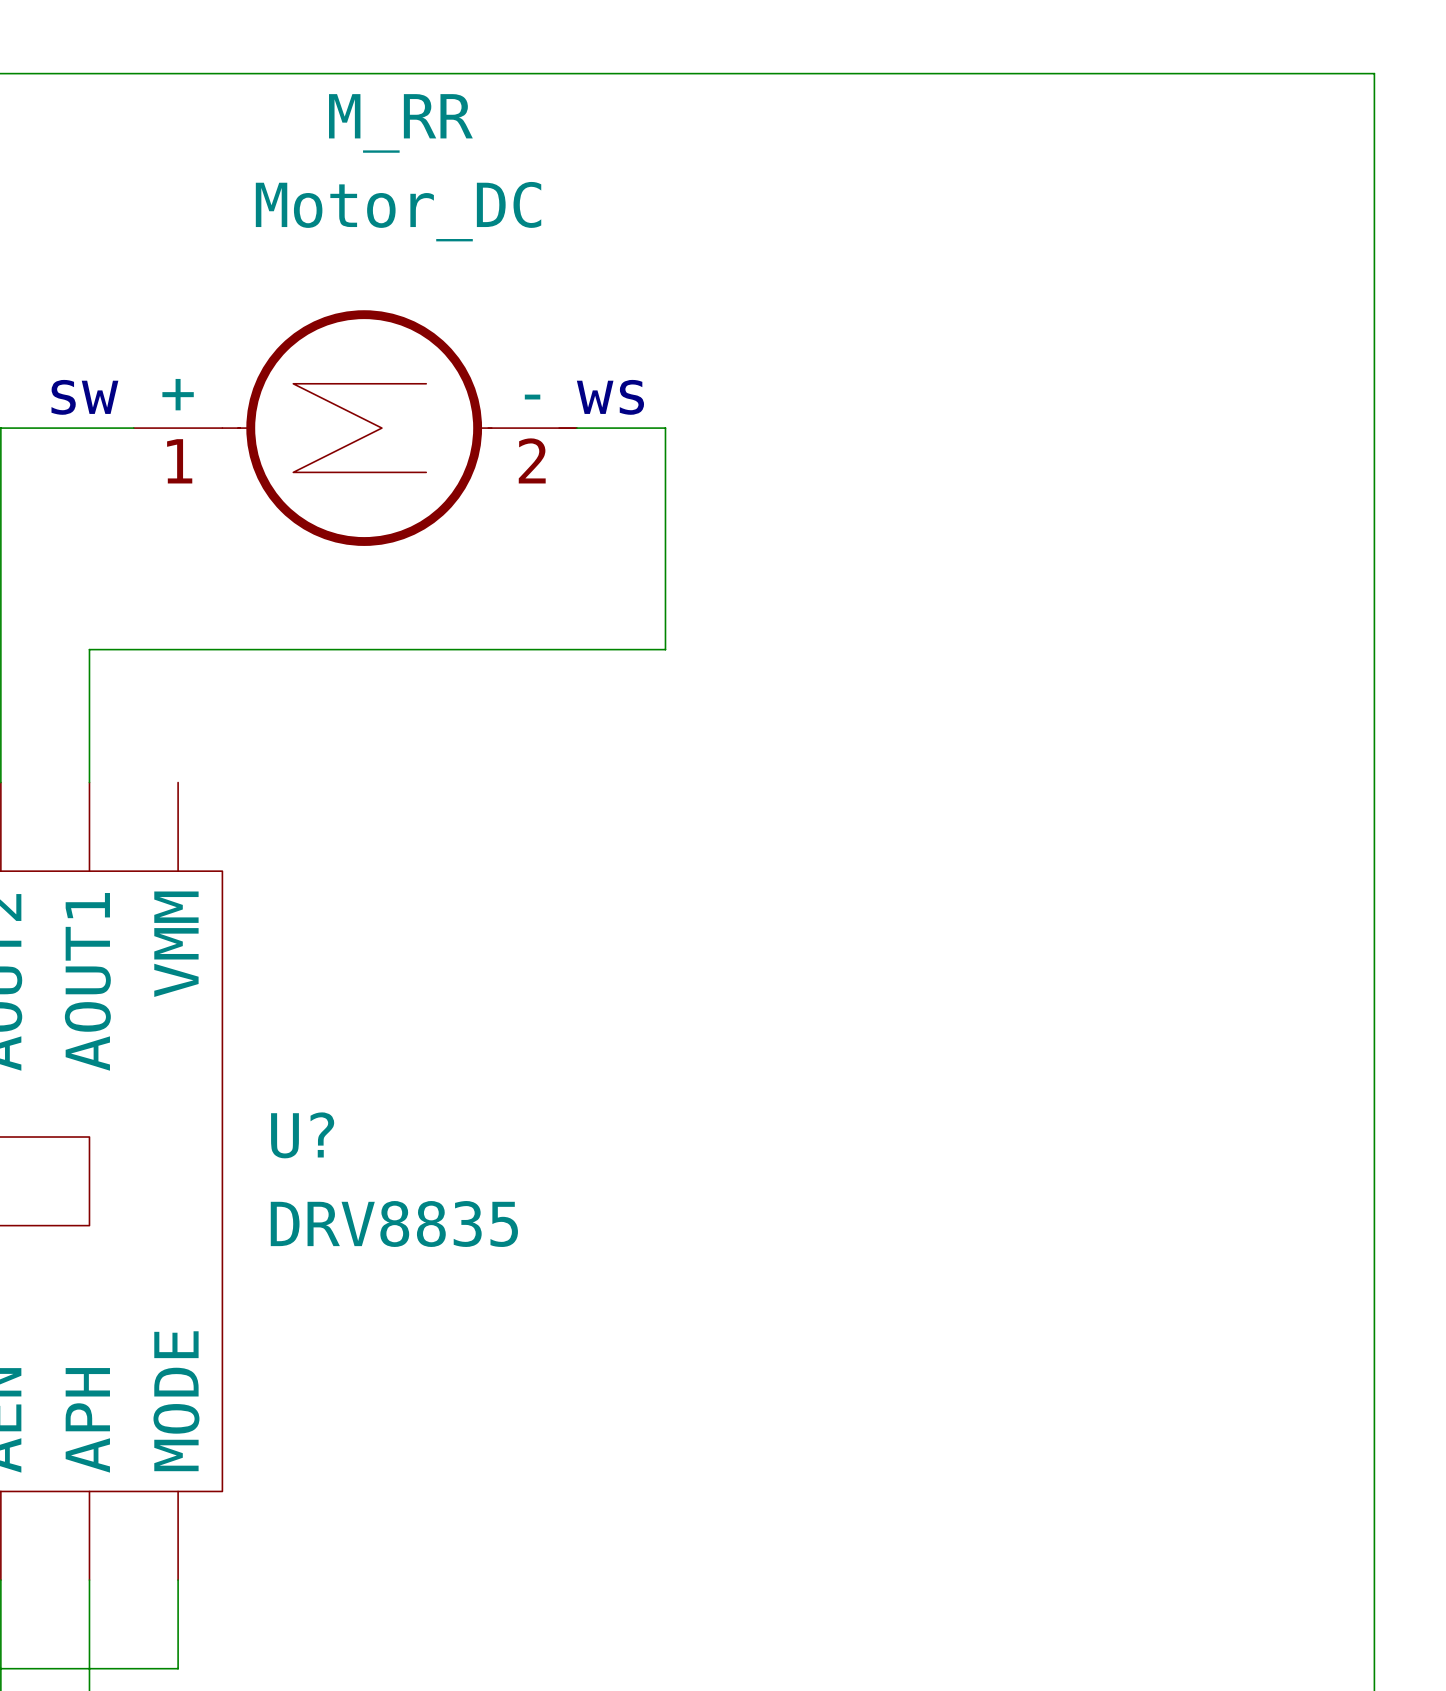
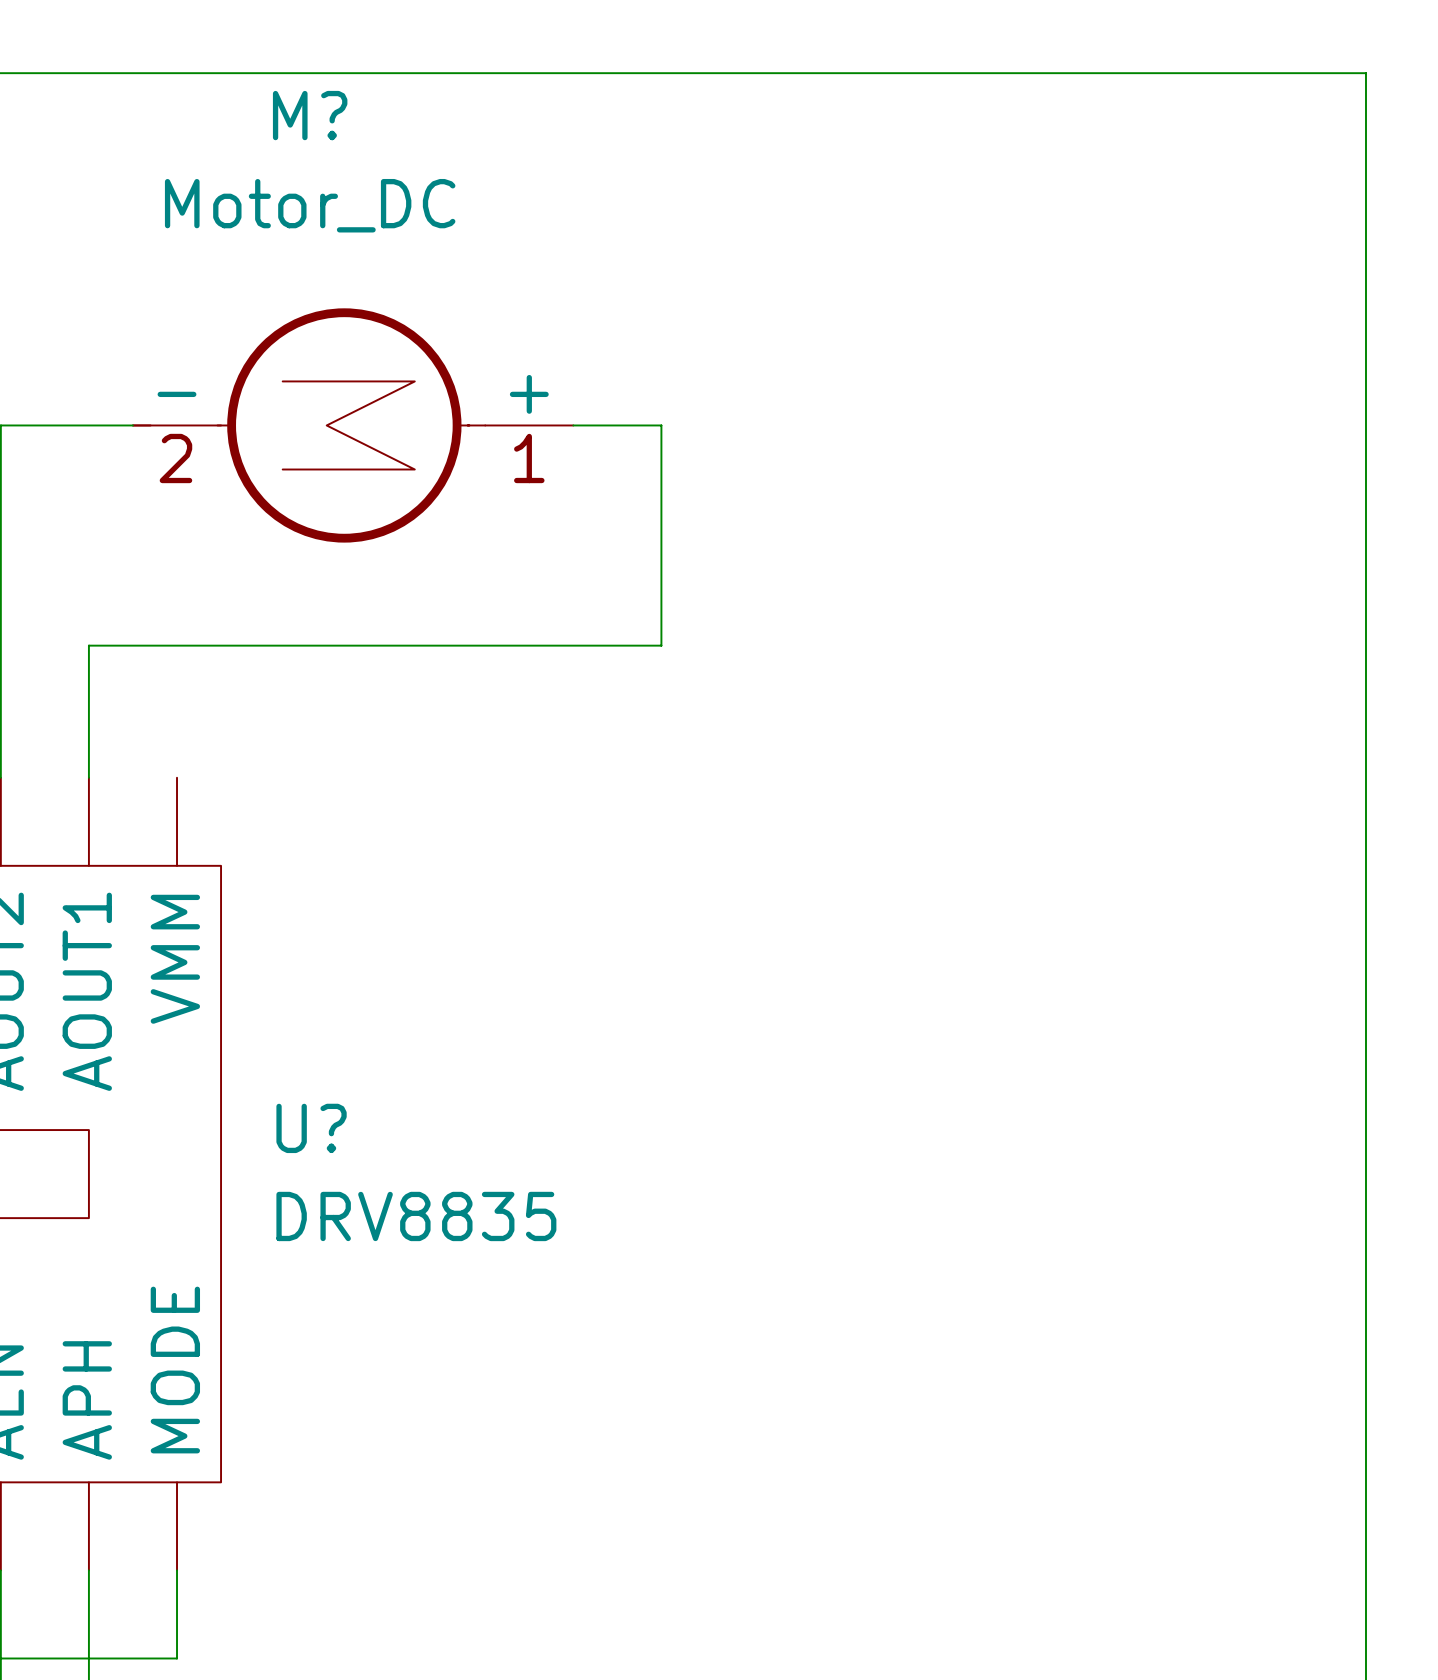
text: sw (84, 397) -> none
text: ws (610, 397) -> none
M_RR: Motor_DC (355, 428) -> none
M?: none -> Motor_DC (353, 425)

